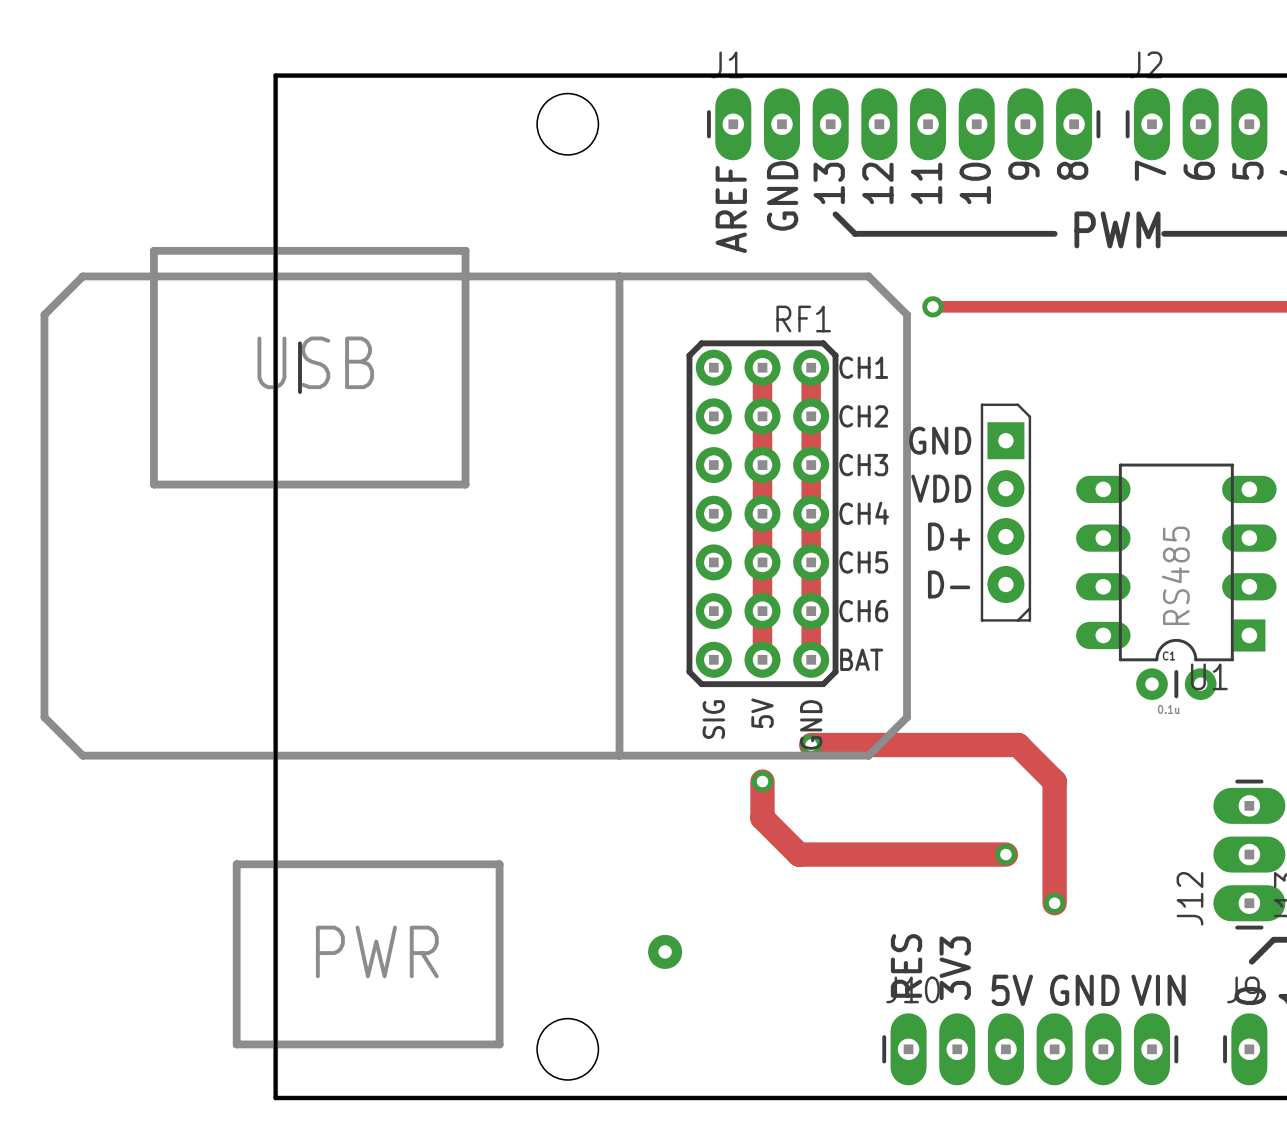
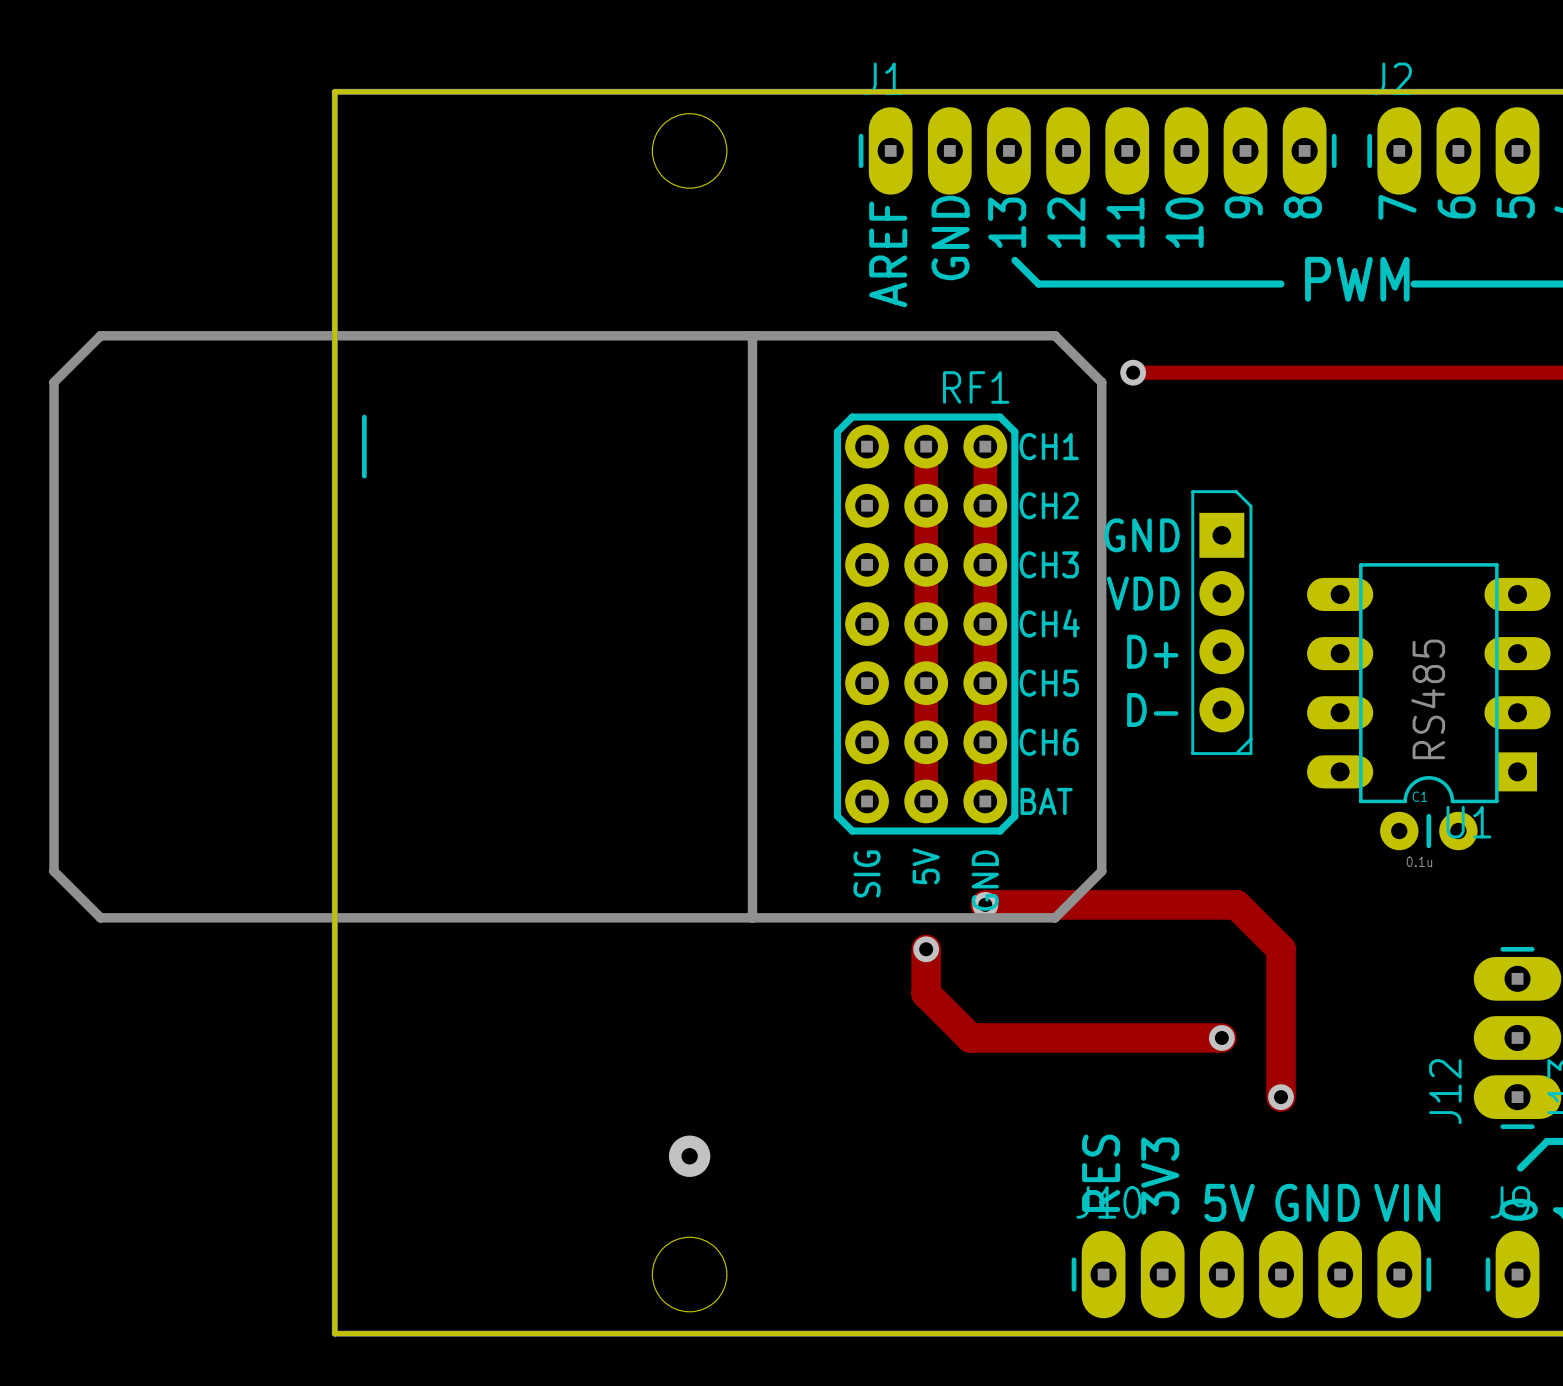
line: (153, 250) (465, 250) (465, 484) (153, 484) (153, 250) -> none
text: USB (315, 362) -> none
line: (236, 864) (499, 864) (499, 1044) (236, 1044) (236, 864) -> none
text: PWR (377, 951) -> none
via position: (665, 951) -> (689, 1156)

